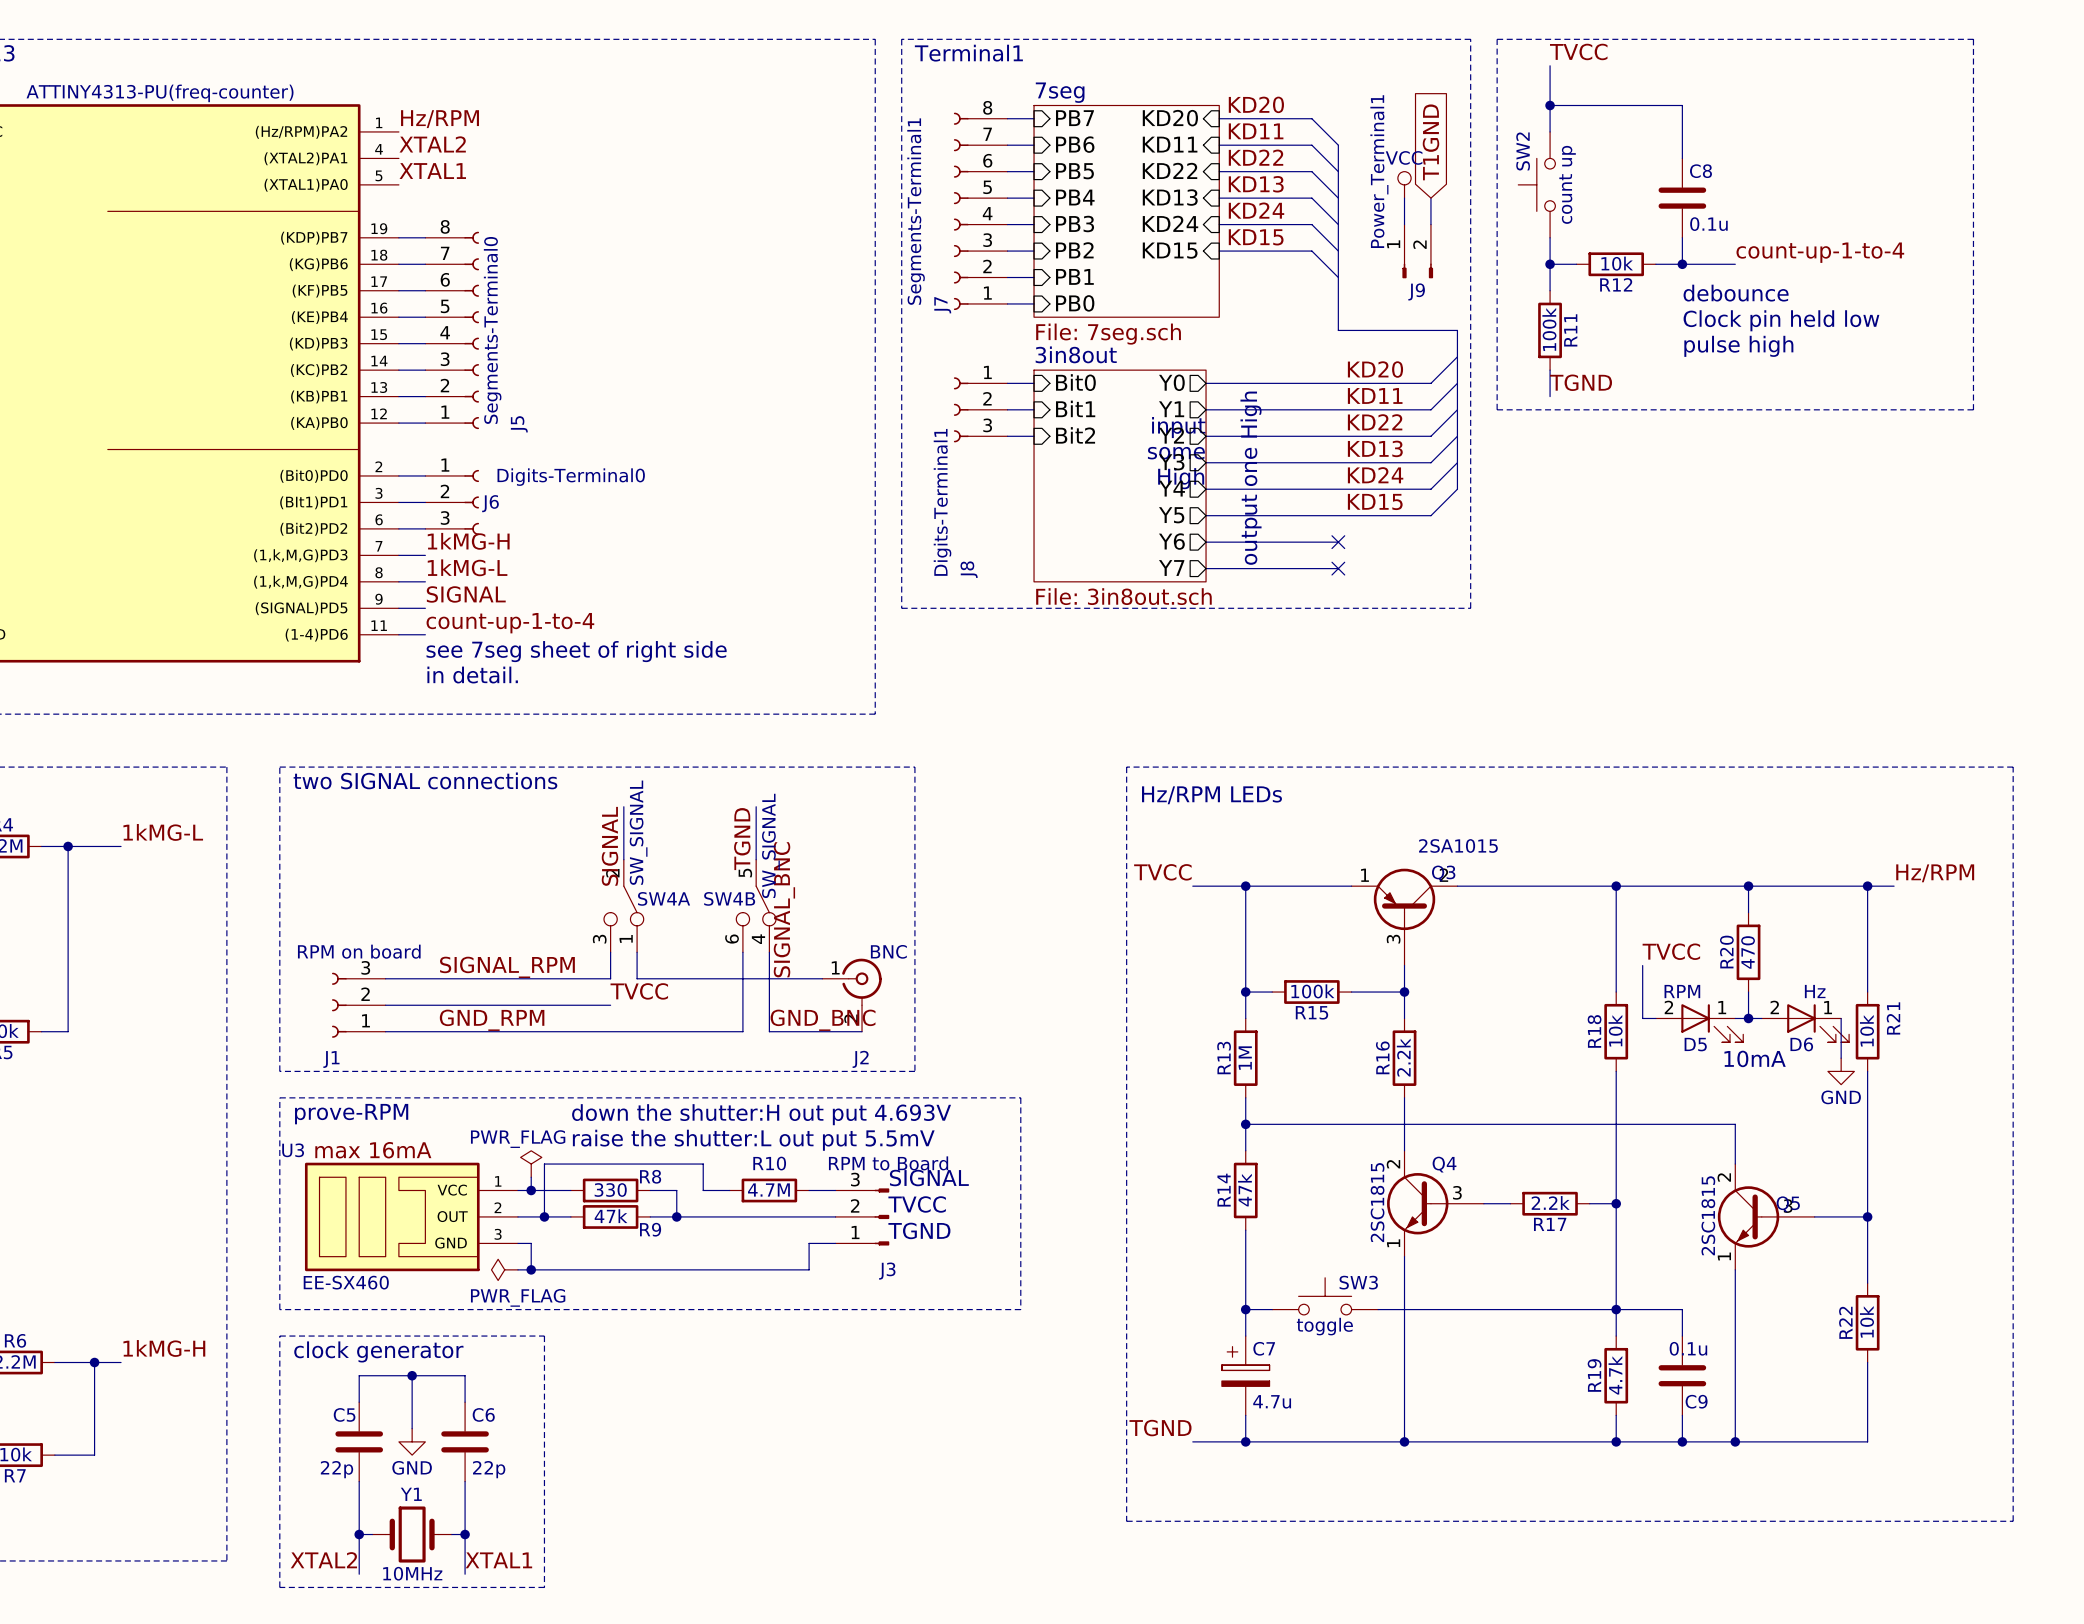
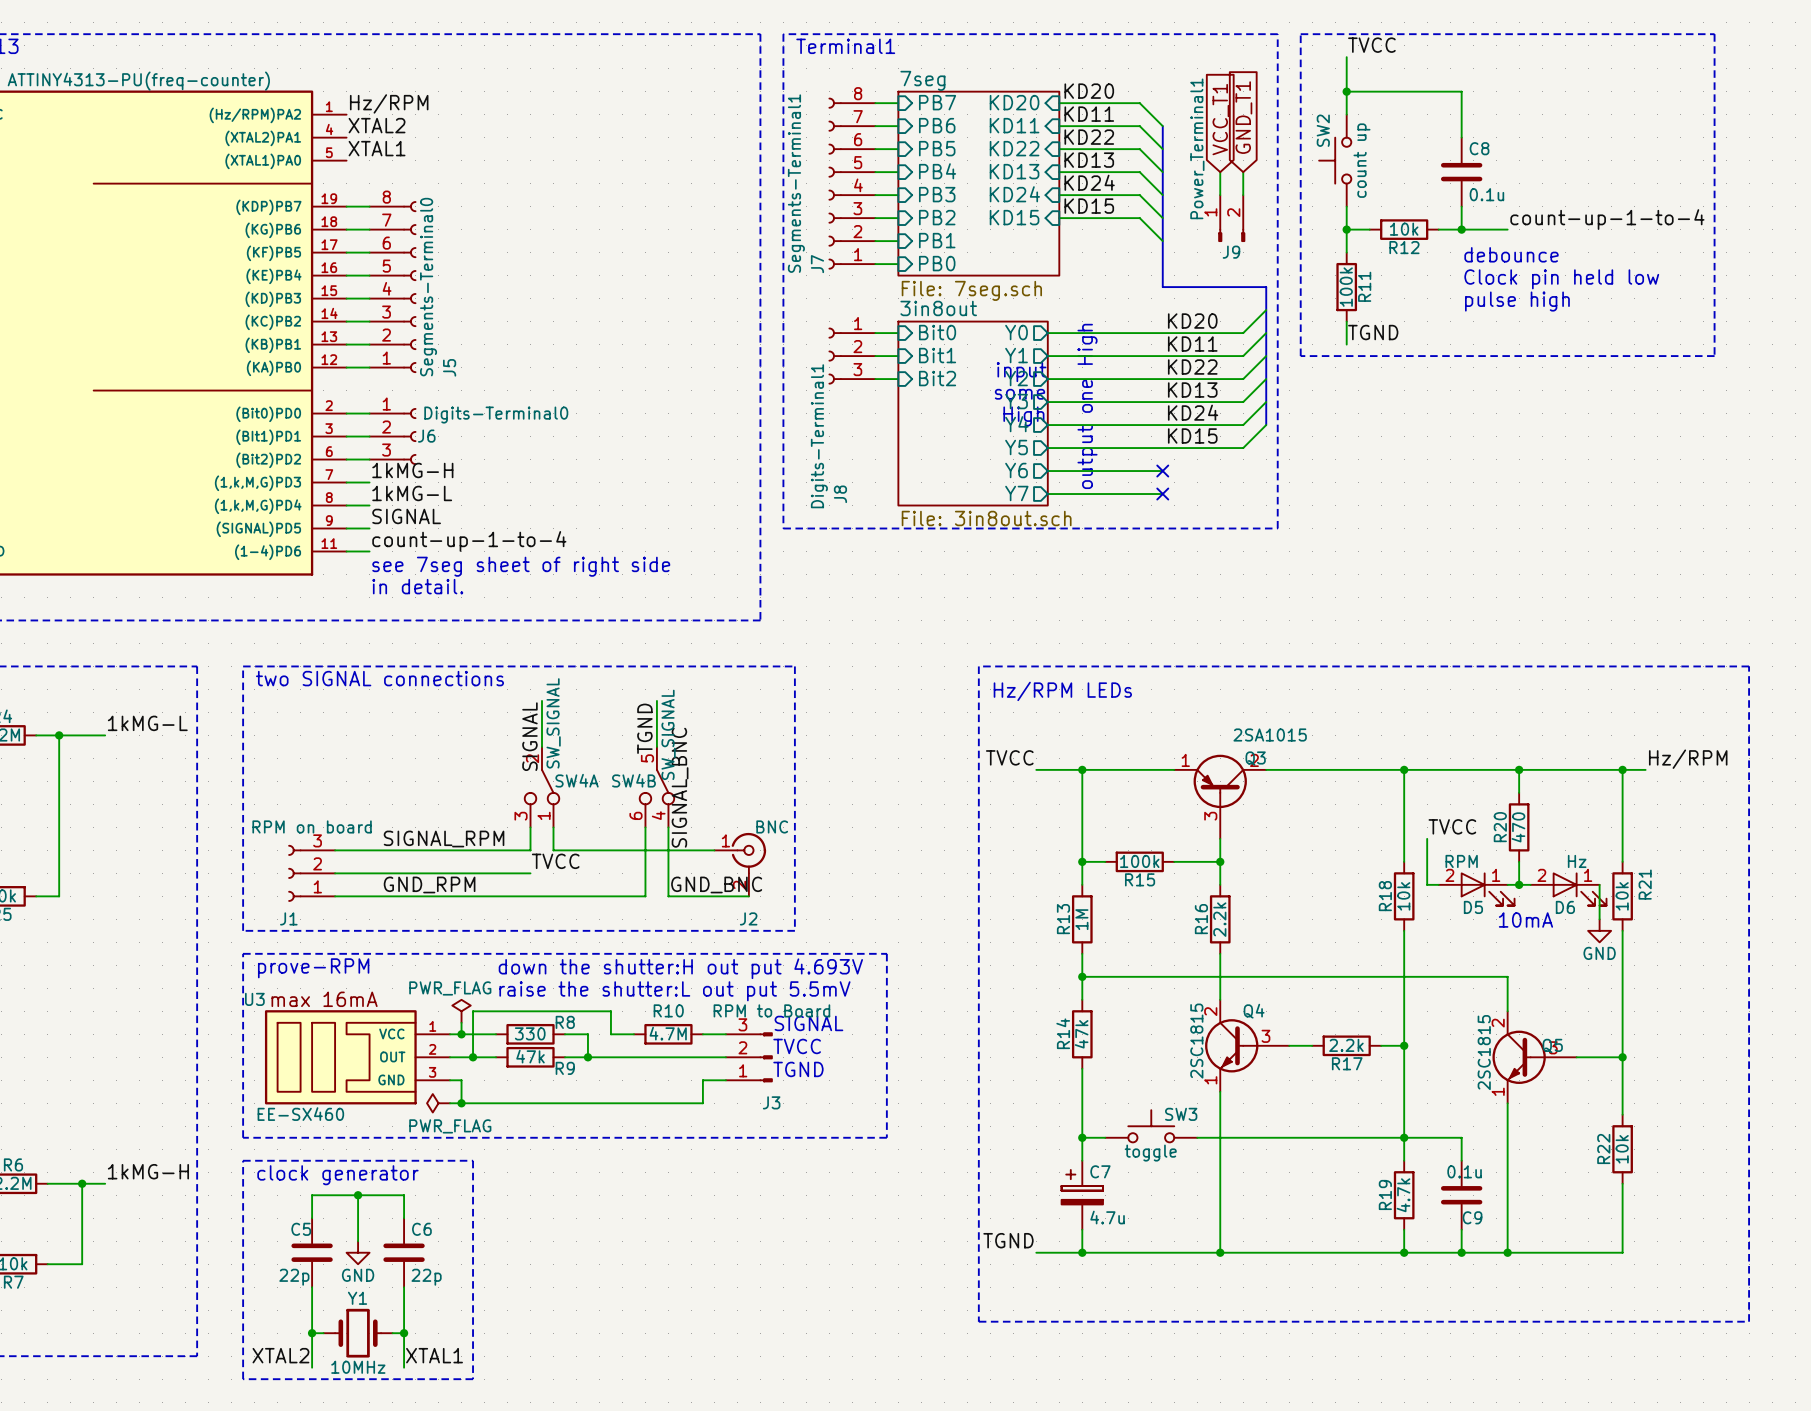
global label: none -> VCC_T1 (1220, 119)
global label: T1GND (1430, 142) -> GND_T1 (1243, 117)
power symbol: VCC (1404, 184) -> none

